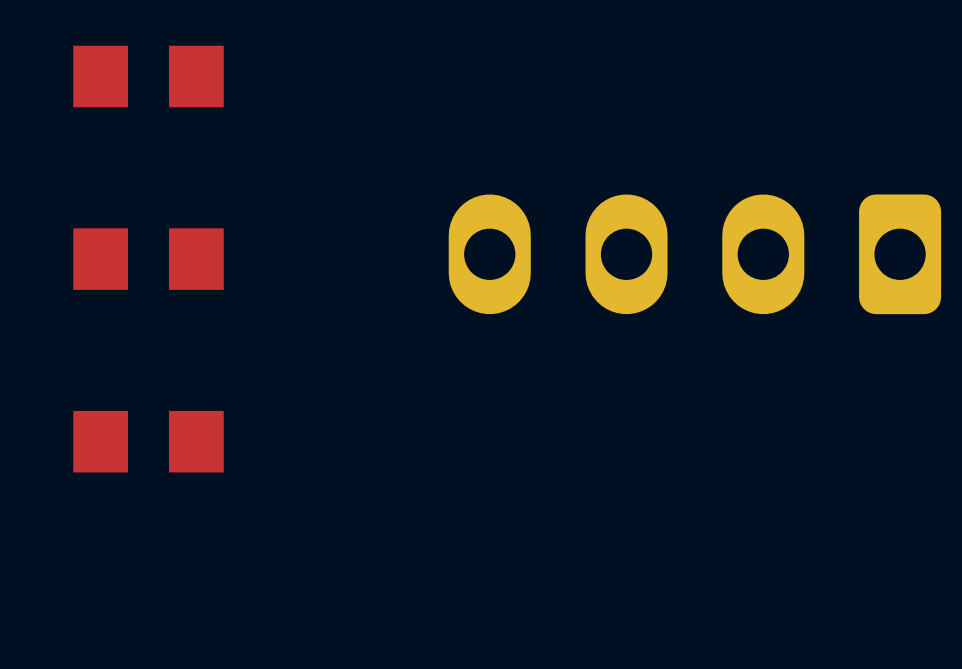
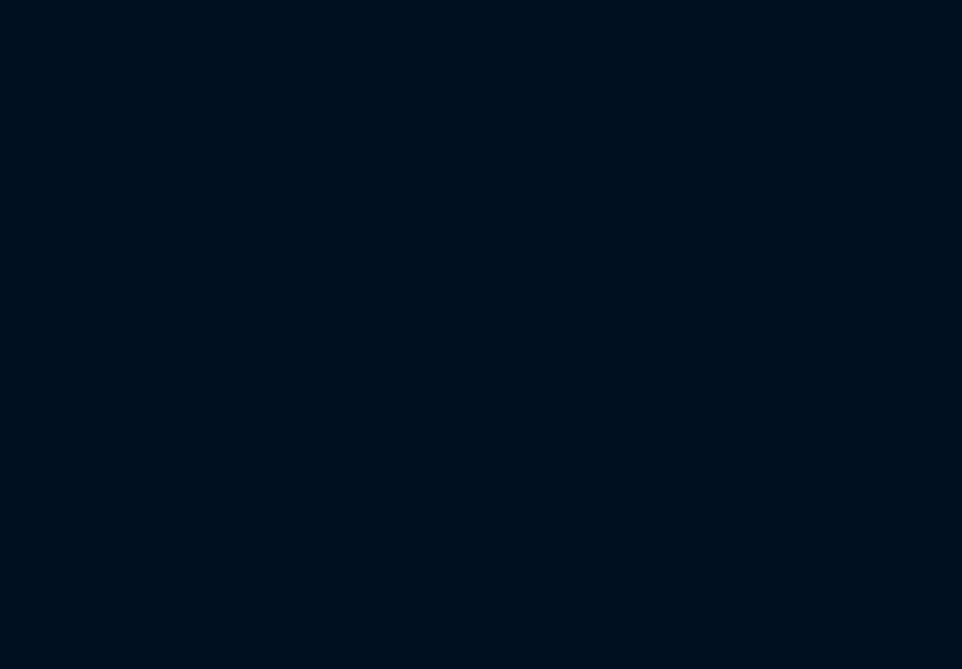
part: (148, 76) -> none
part: (694, 254) -> none
part: (148, 259) -> none
part: (148, 441) -> none

